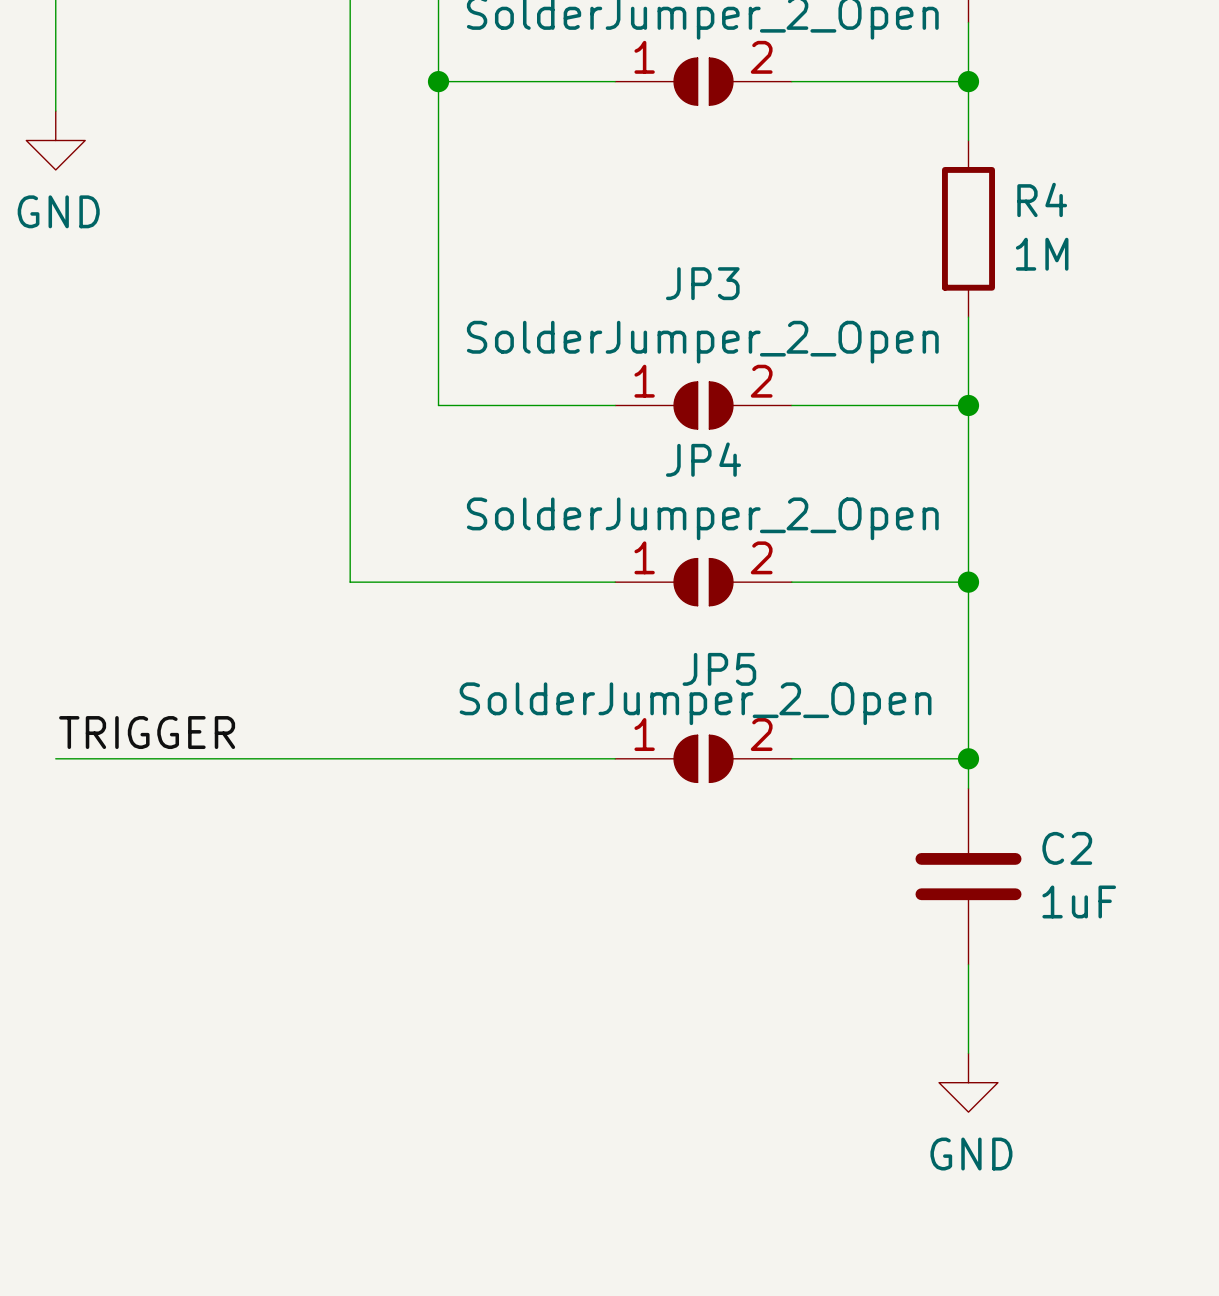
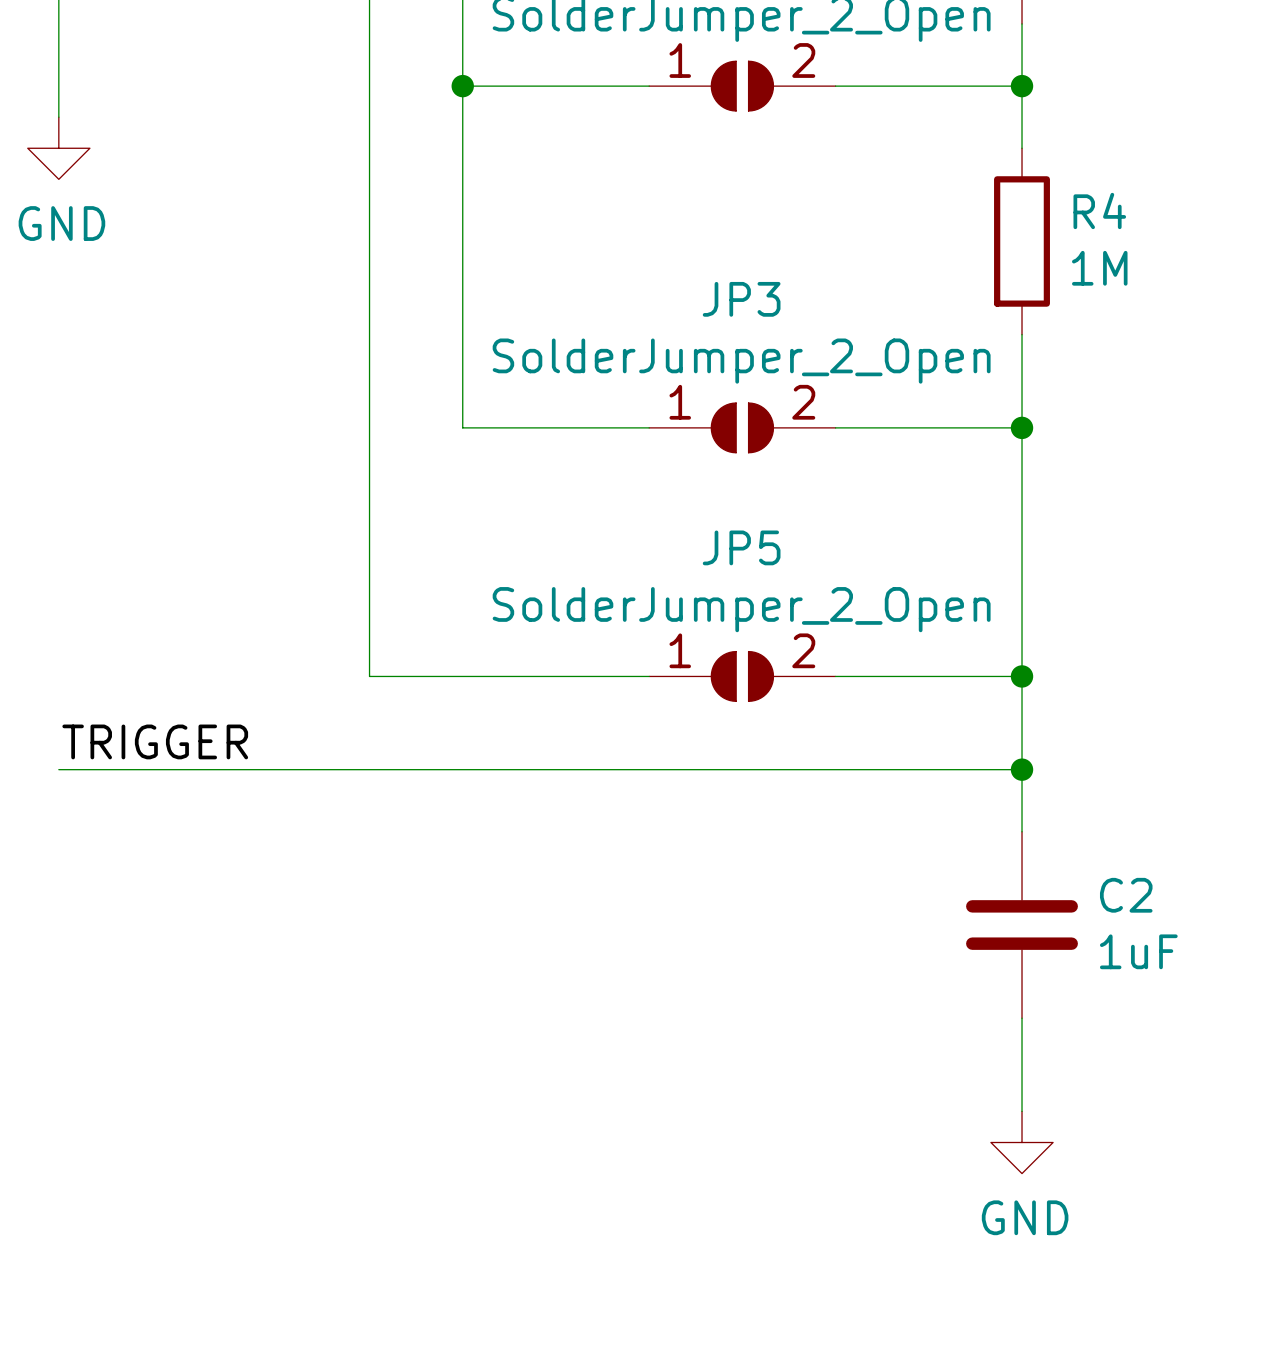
wire: (350, 582) (615, 582) -> (369, 614) (369, 676) (649, 676)
JP4: SolderJumper_2_Open (703, 582) -> none
wire: (791, 582) (968, 582) -> (835, 676) (1022, 676)
junction: (968, 582) -> none
junction: none -> (1022, 676)
JP5 name position: JP5 (719, 669) -> JP5 (741, 547)
JP5 value position: SolderJumper_2_Open (695, 703) -> SolderJumper_2_Open (741, 609)
wire: none -> (58, 769) (1022, 769)
label position: TRIGGER (147, 732) -> TRIGGER (155, 741)
wire: (55, 758) (615, 758) -> none
JP5 position: (703, 758) -> (742, 676)
wire: (791, 758) (968, 758) -> none
junction position: (968, 758) -> (1022, 769)

